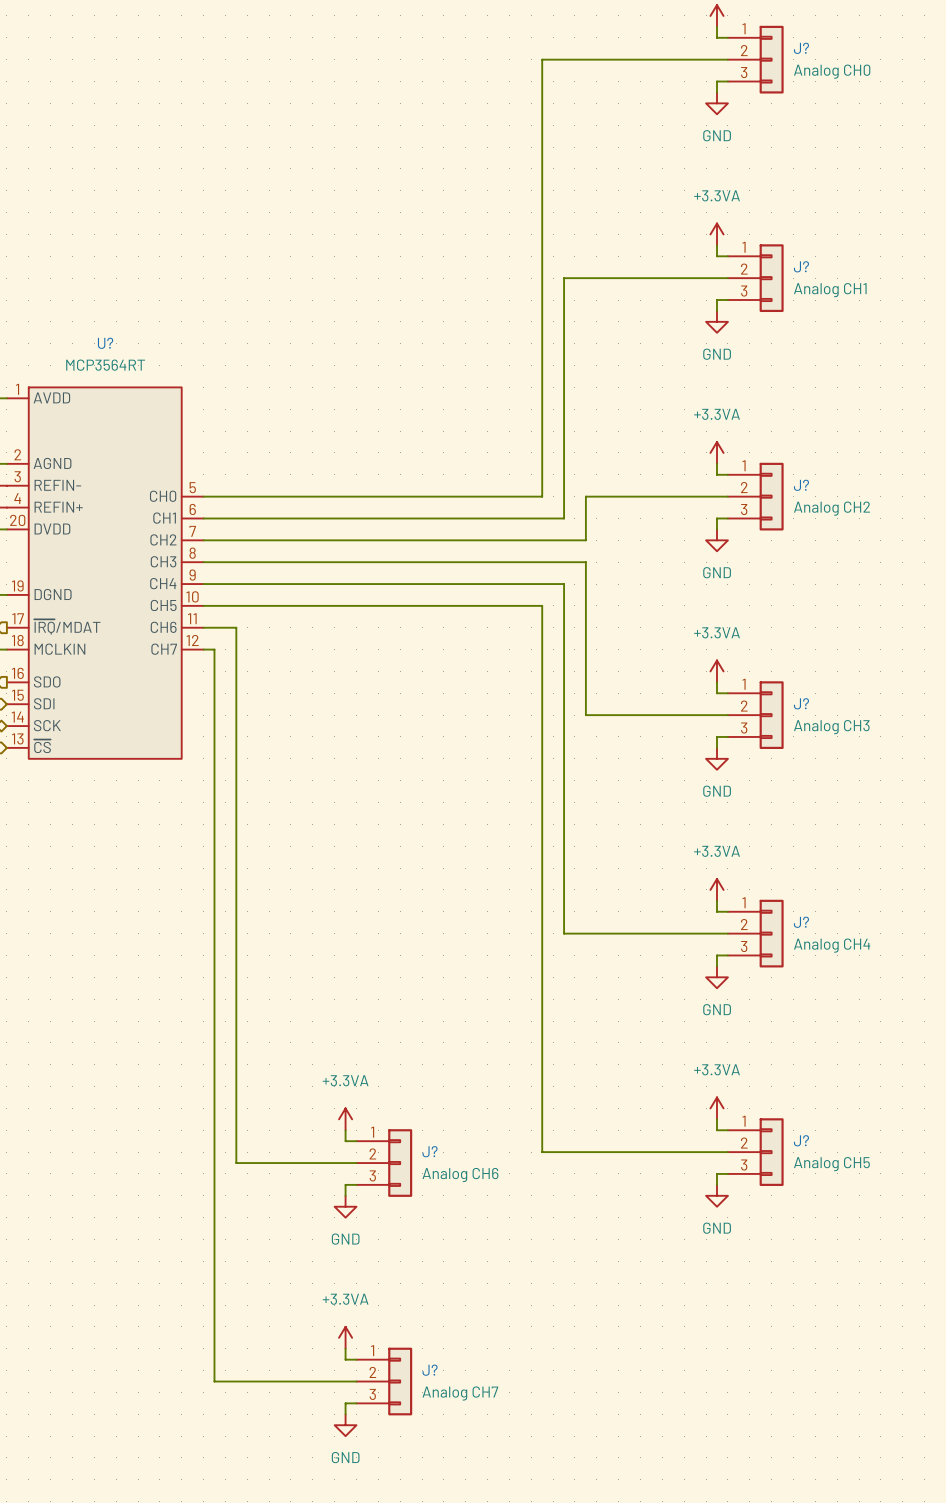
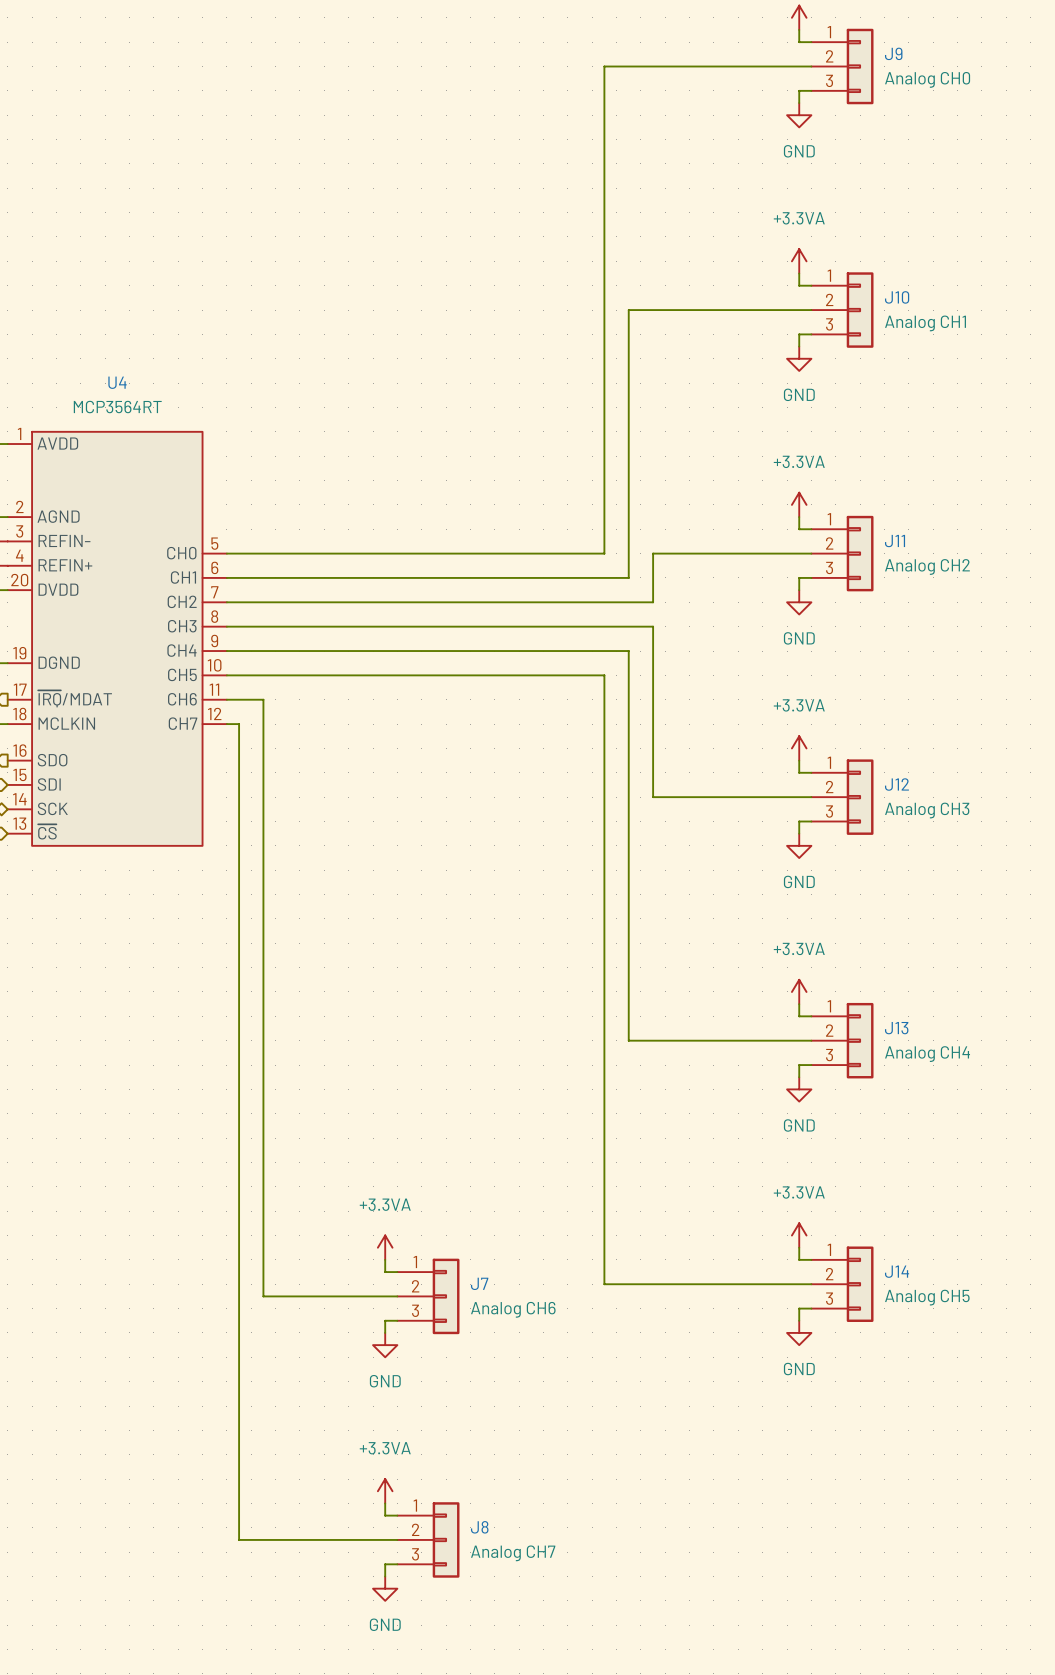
J? name: J? (801, 48) -> J9 (893, 53)
J? name: J? (801, 266) -> J10 (897, 297)
U? name: U? (105, 343) -> U4 (117, 382)
J? name: J? (801, 485) -> J11 (895, 541)
J? name: J? (801, 703) -> J12 (896, 784)
J? name: J? (801, 922) -> J13 (896, 1028)
J? name: J? (801, 1140) -> J14 (897, 1271)
J? name: J? (430, 1151) -> J7 (479, 1283)
J? name: J? (430, 1370) -> J8 (479, 1527)

